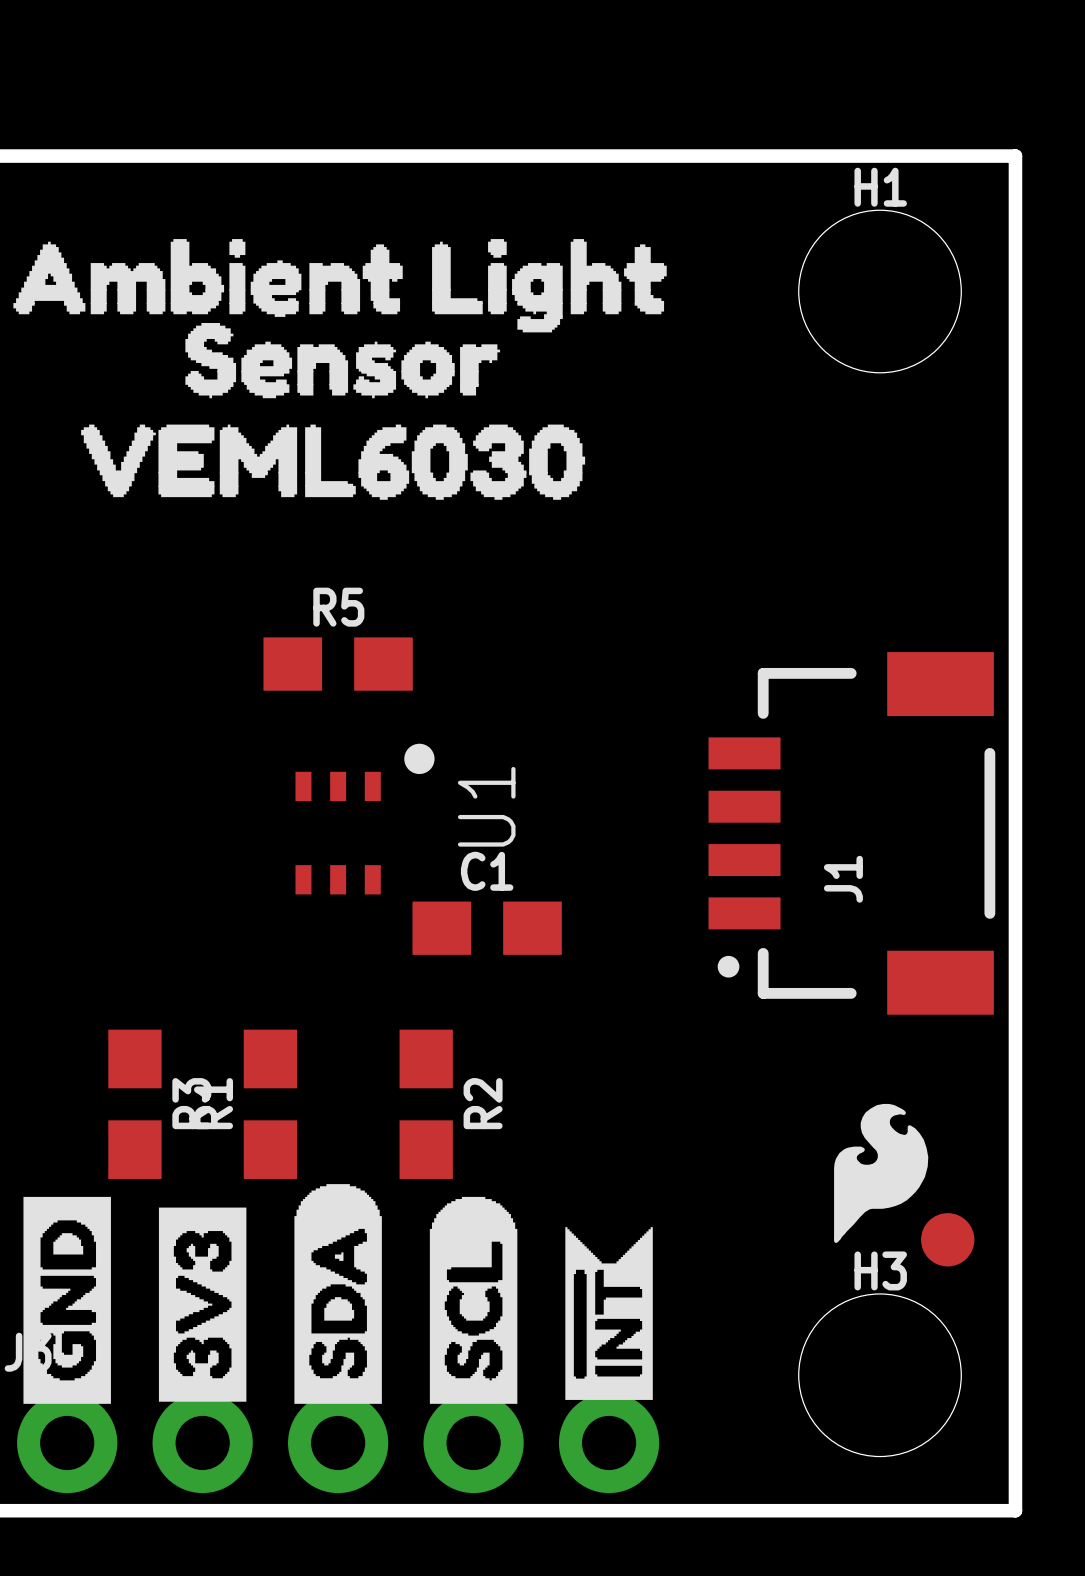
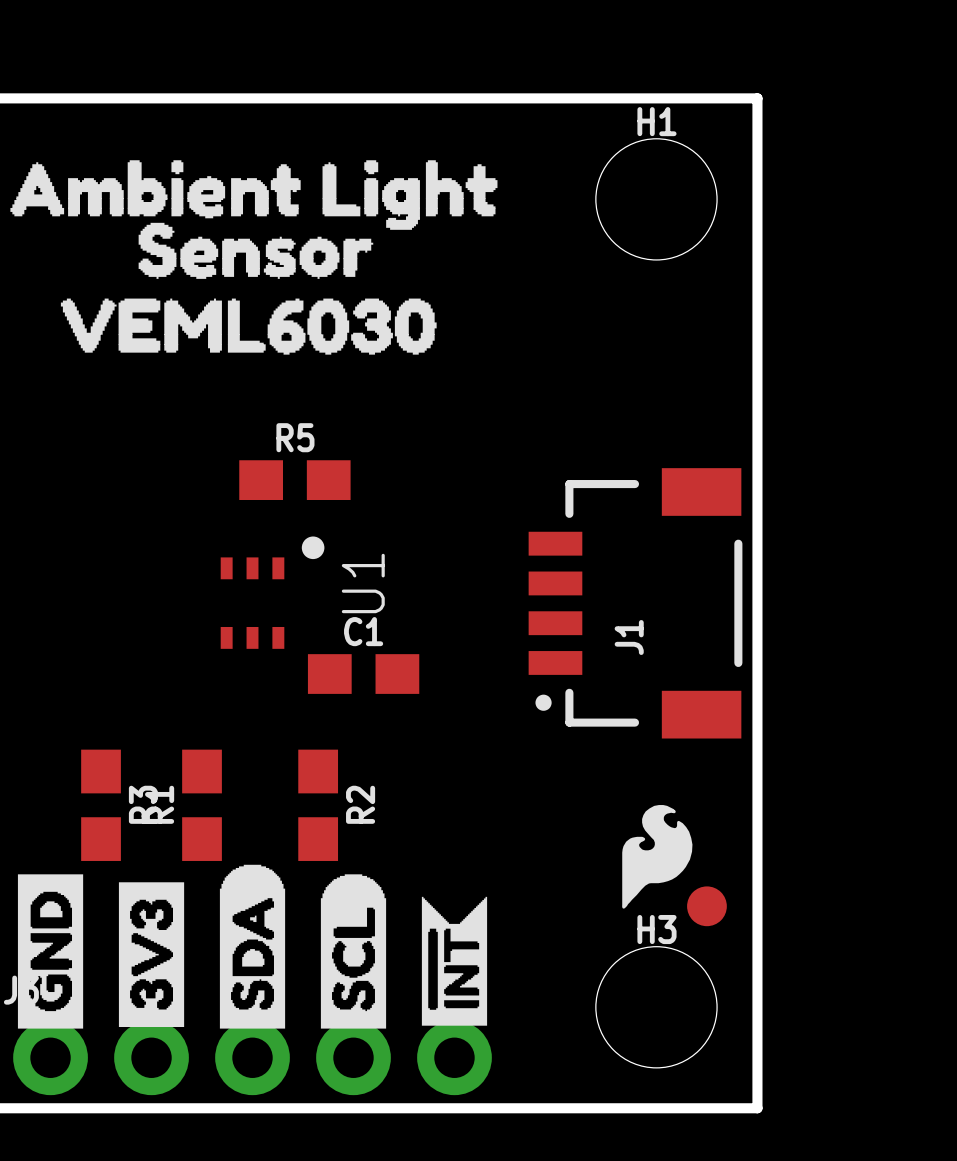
R5 position: (338, 664) -> (294, 480)

